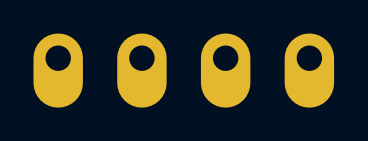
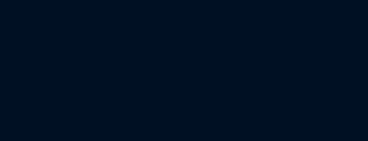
part: (183, 70) -> none

